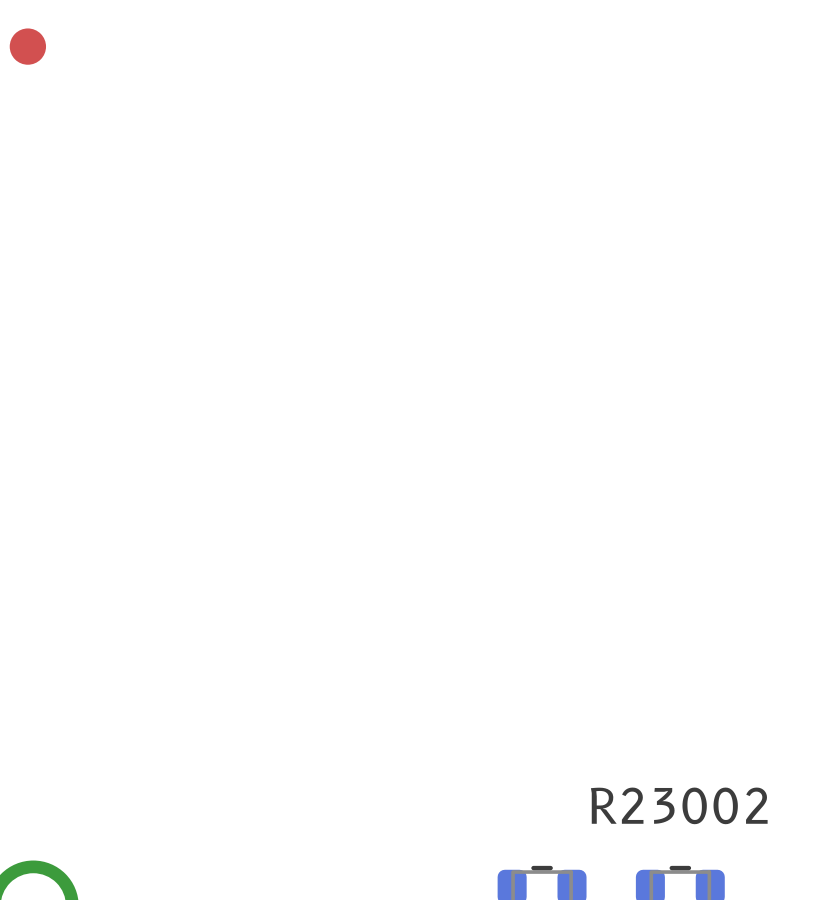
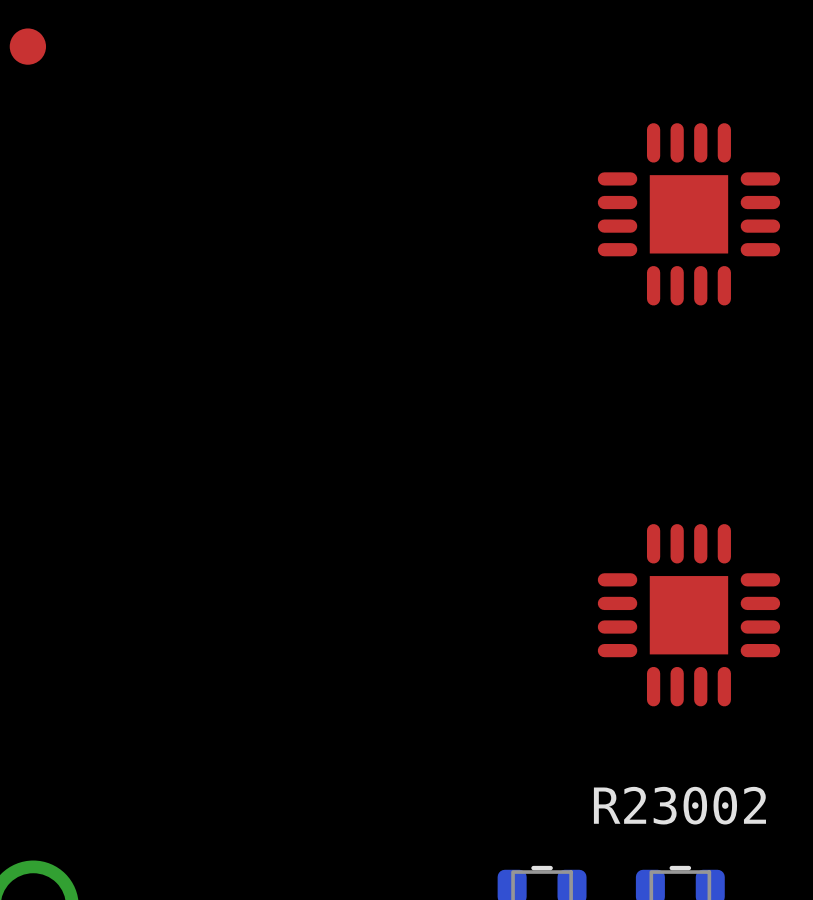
part: none -> (688, 214)
part: none -> (688, 615)

